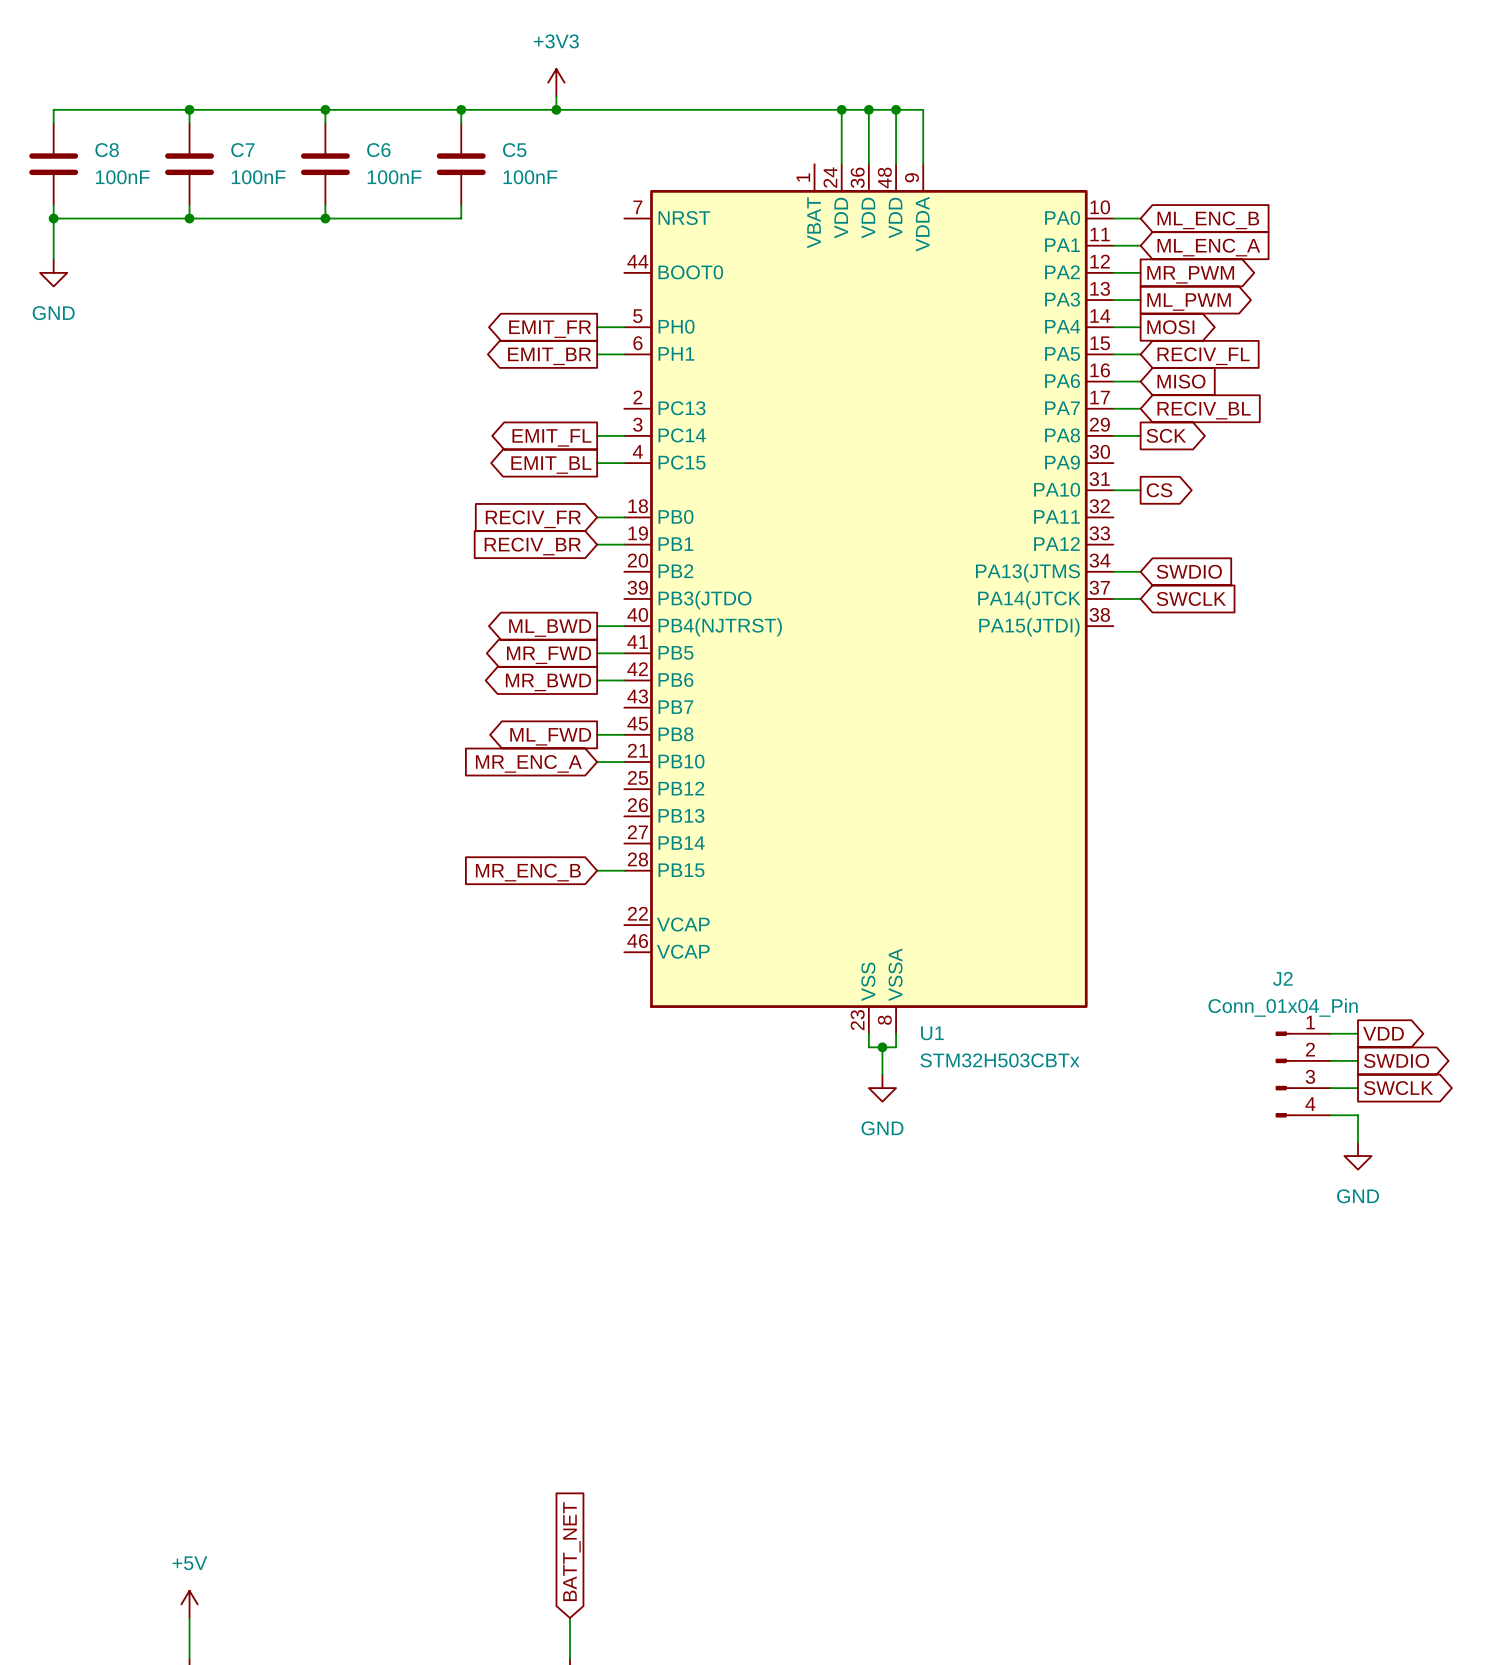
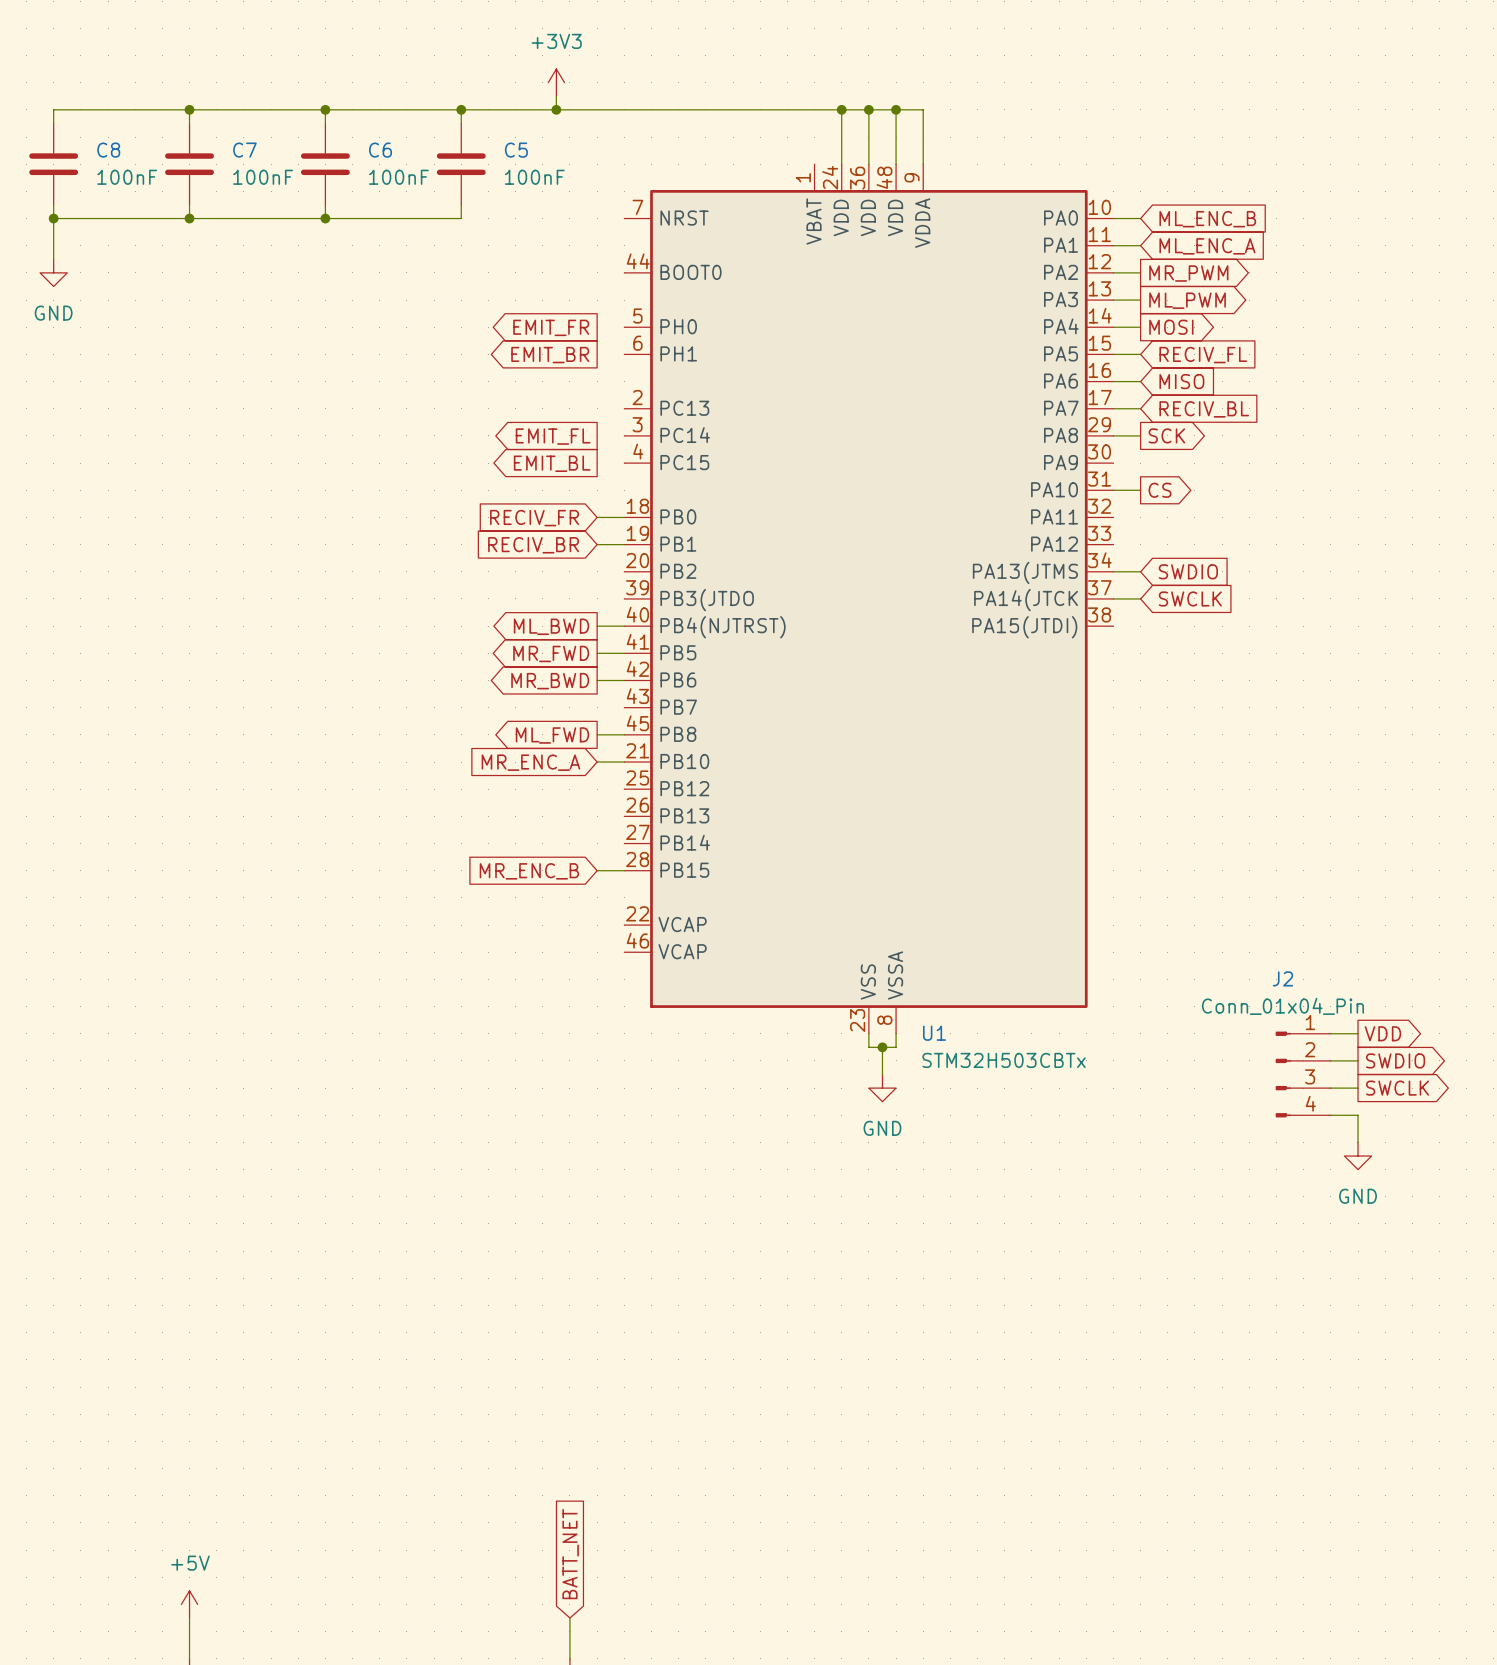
wire: (597, 327) (624, 327) -> none
wire: (597, 354) (624, 354) -> none
wire: (597, 435) (624, 435) -> none
wire: (597, 463) (624, 463) -> none

